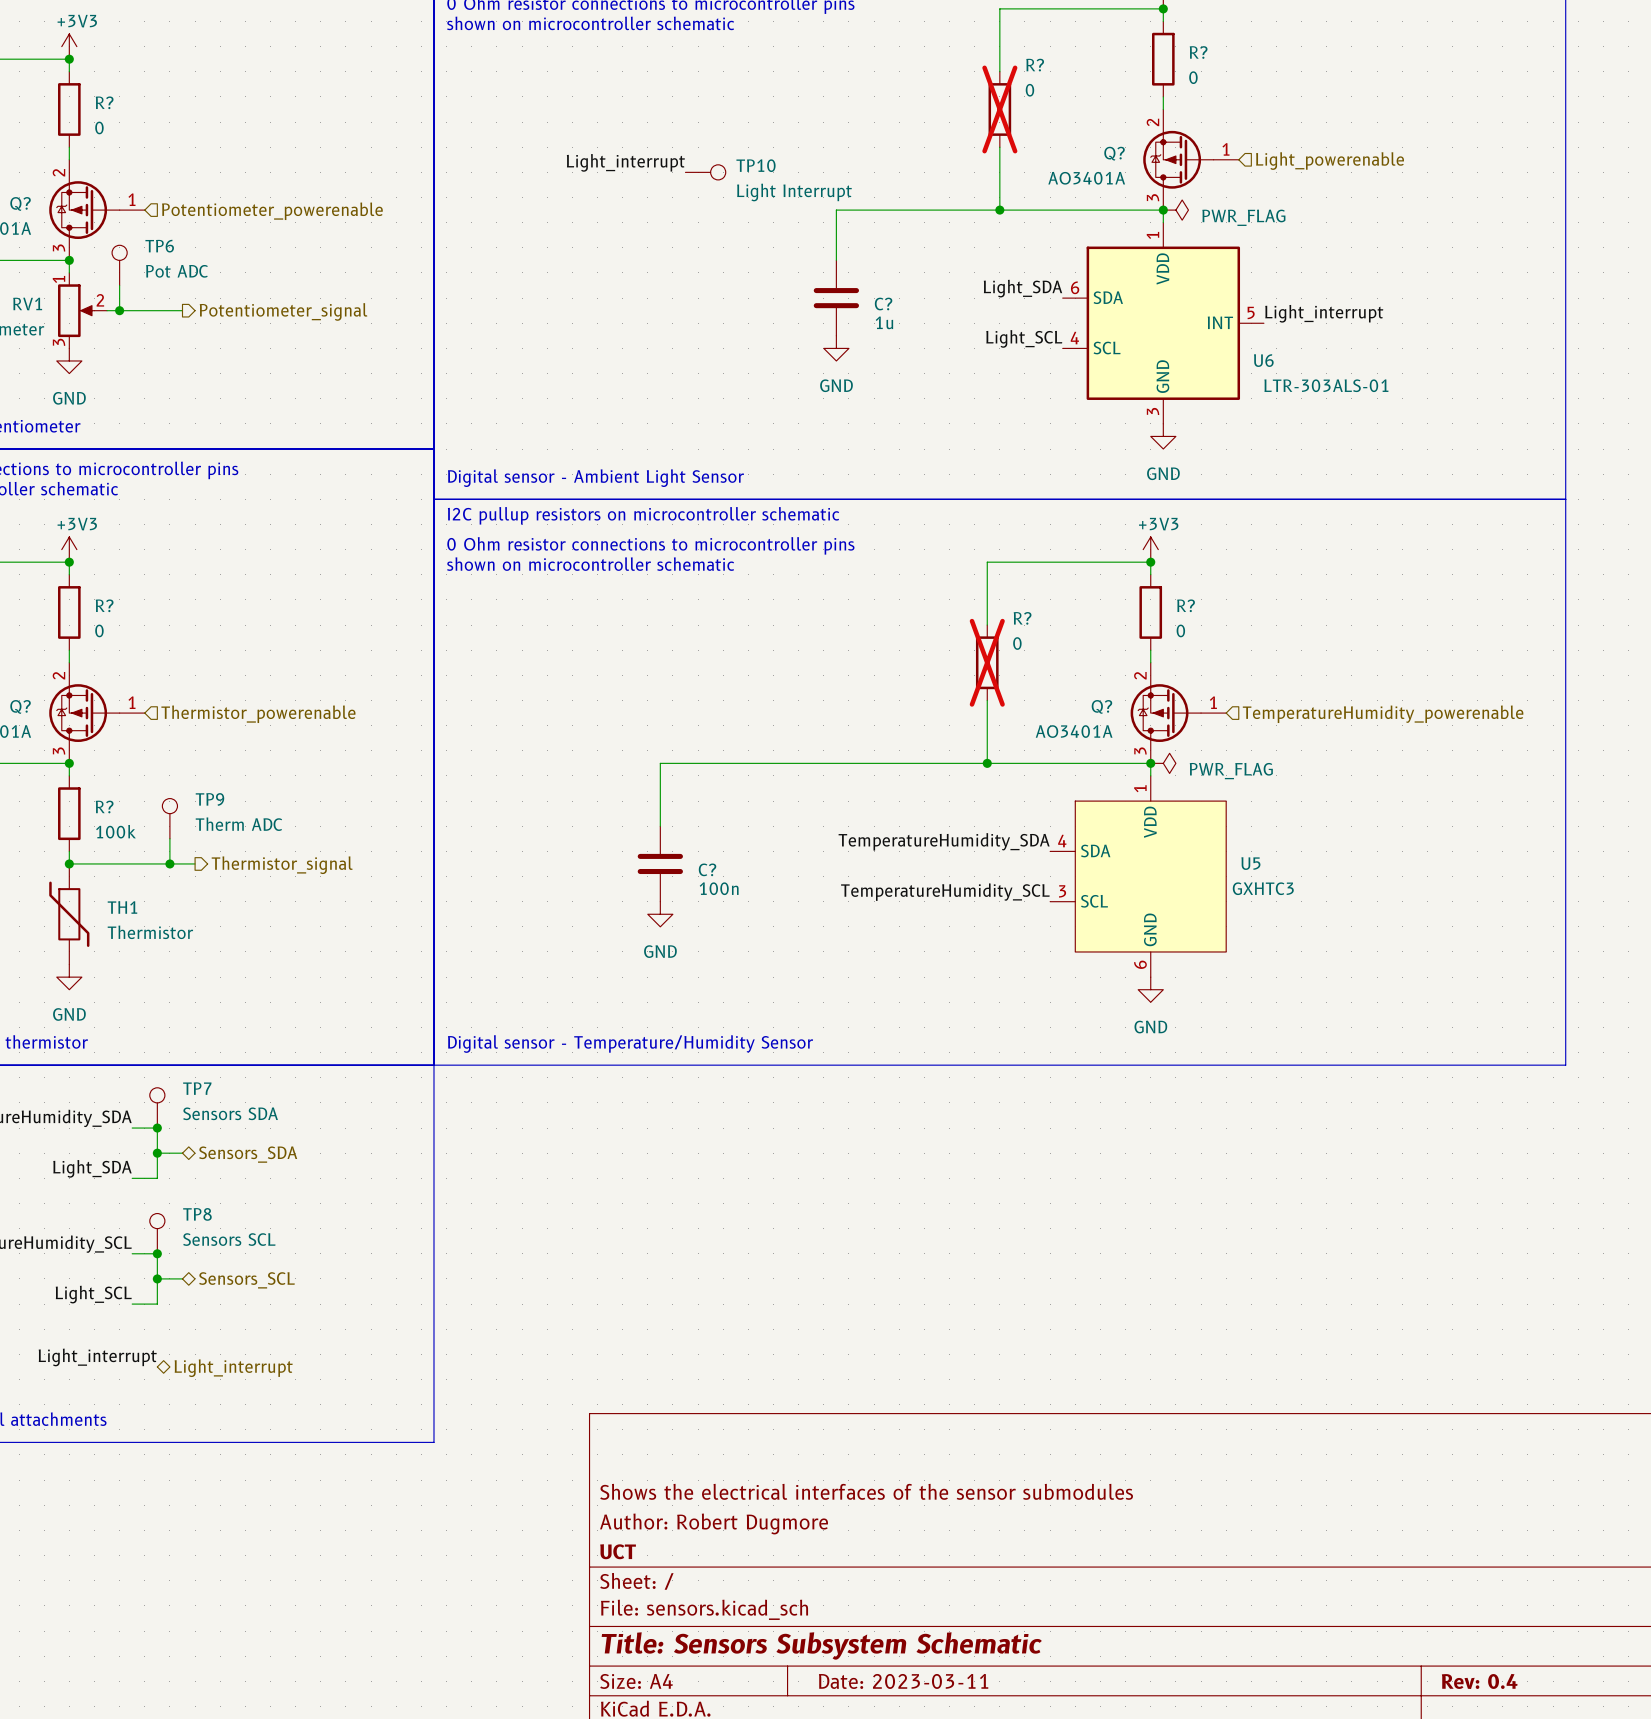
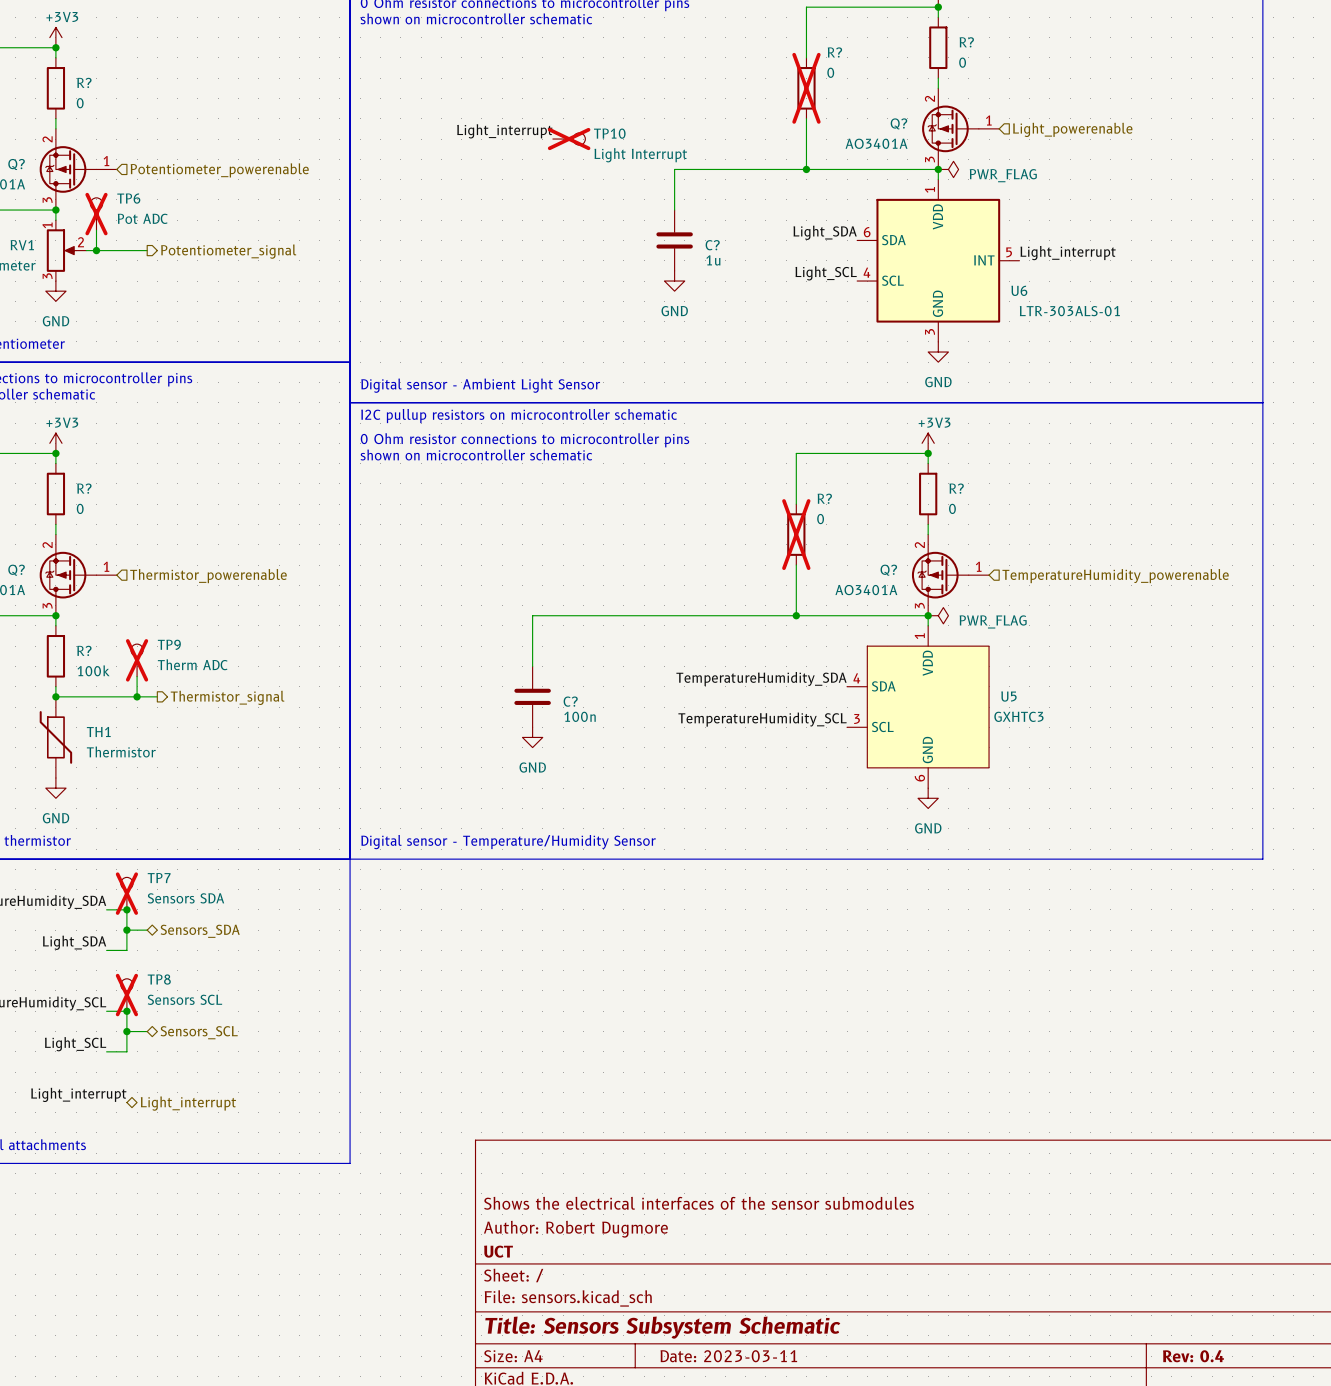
TP10 do-not-place cross: none -> (569, 139)
TP6 do-not-place cross: none -> (96, 214)
TP9 do-not-place cross: none -> (137, 660)
TP7 do-not-place cross: none -> (126, 893)
TP8 do-not-place cross: none -> (126, 995)

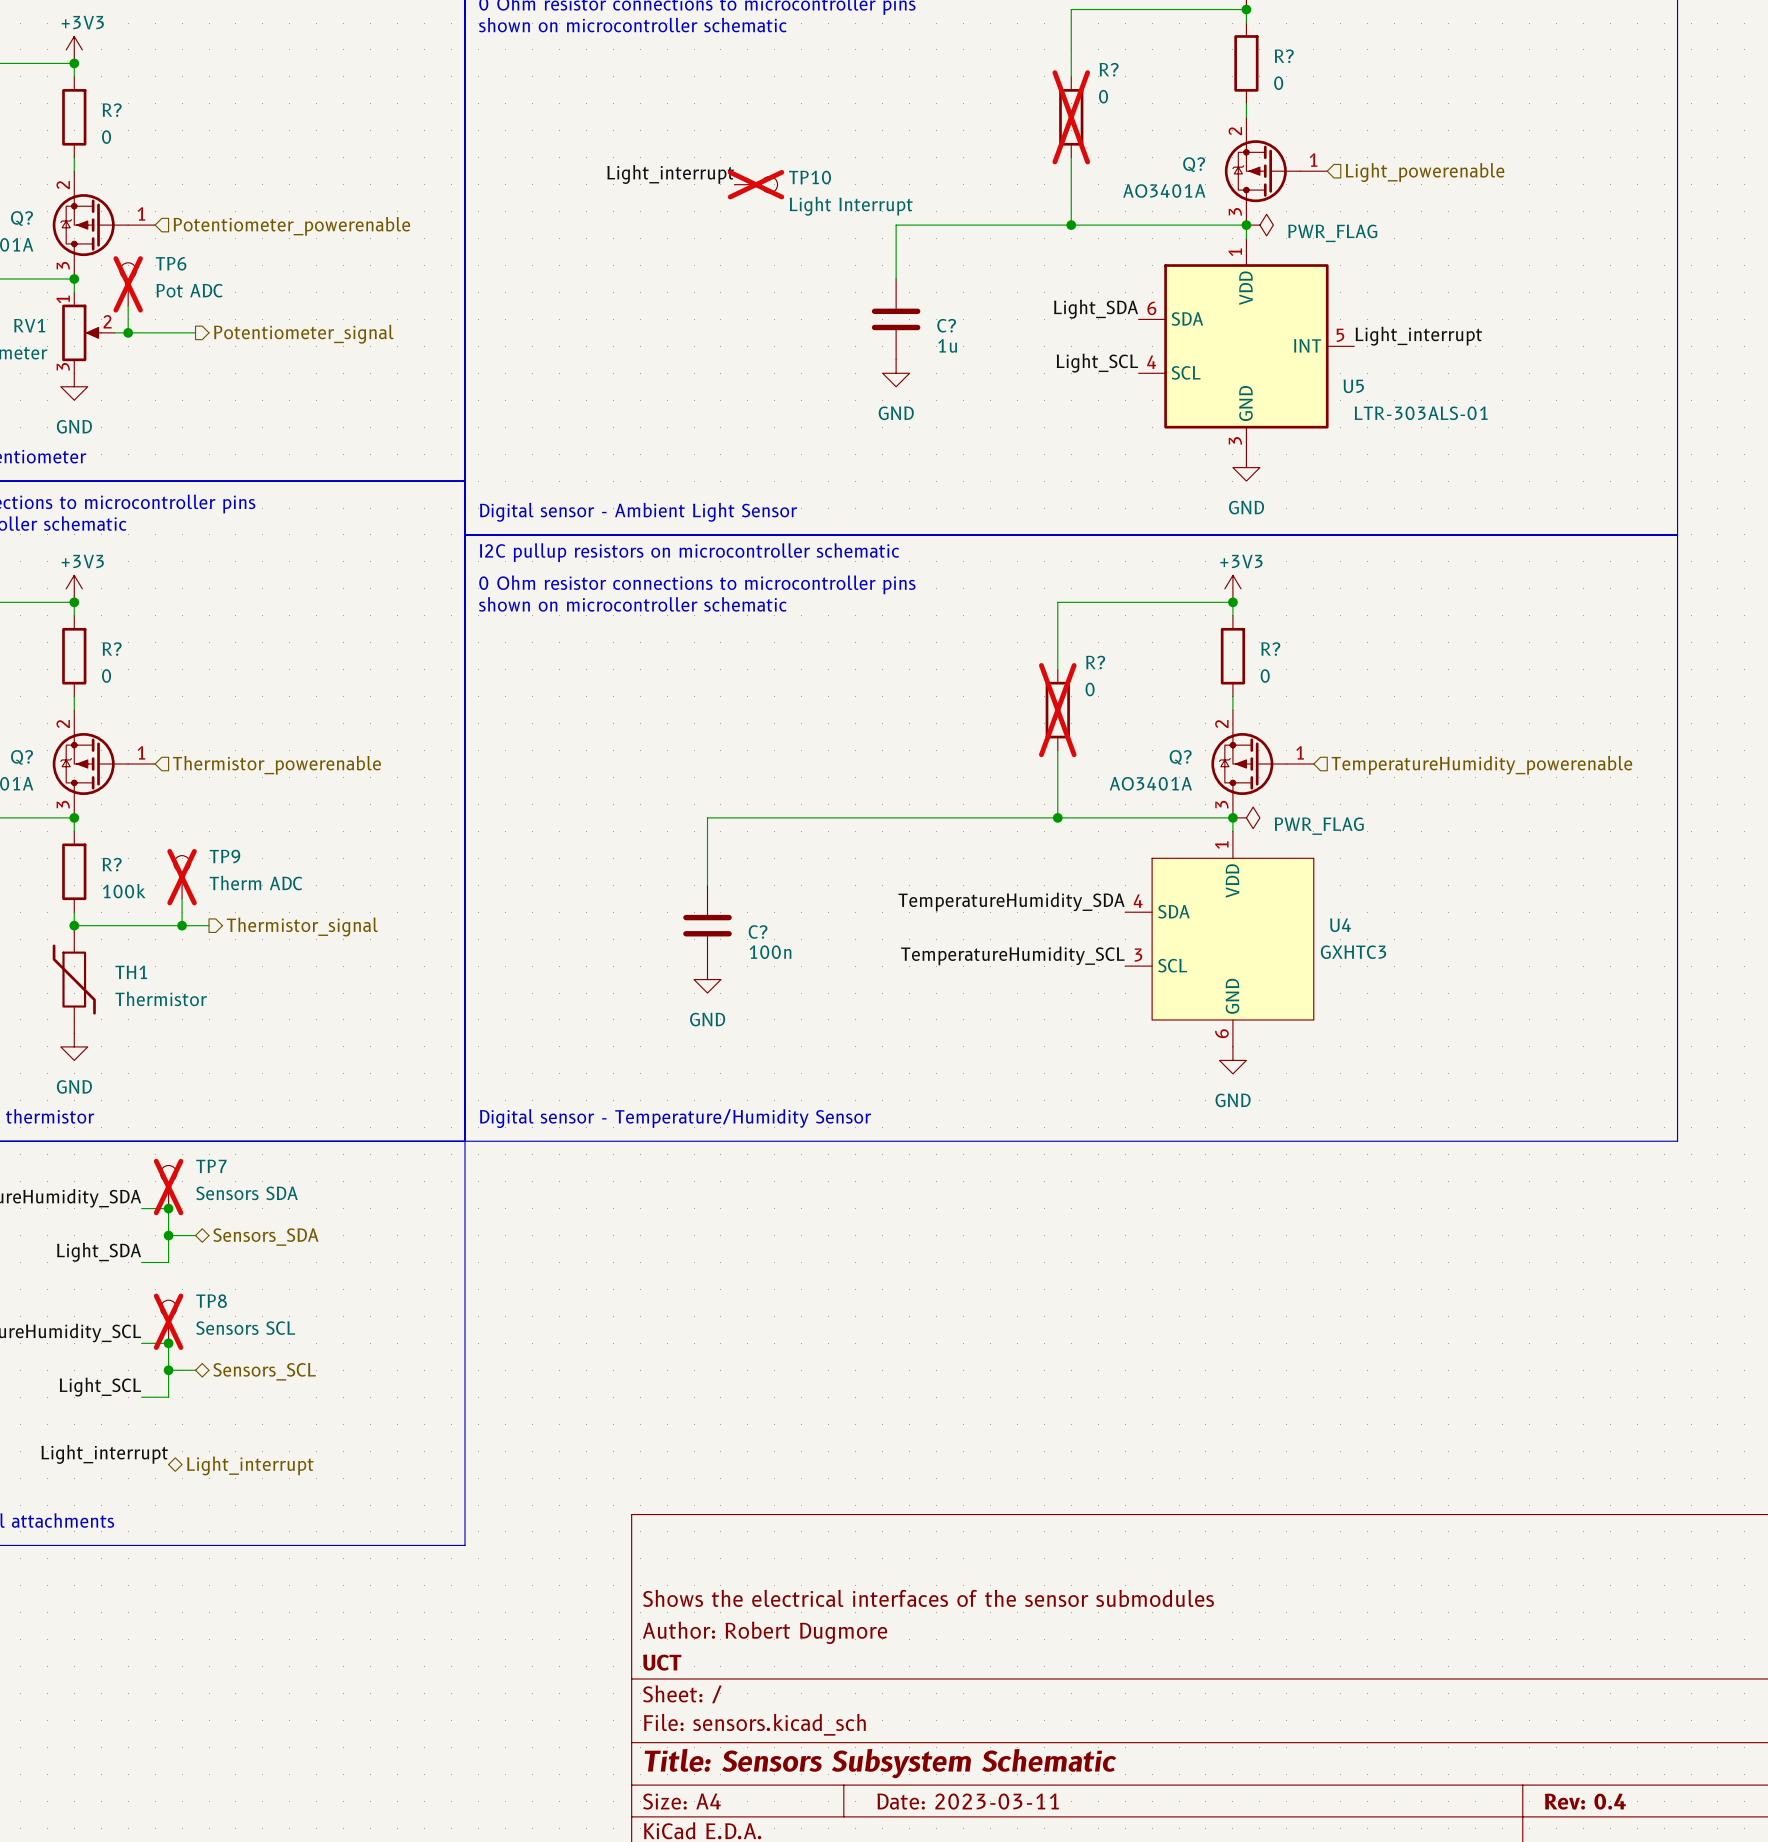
U6 name: U6 (1019, 290) -> U5 (1353, 386)
U5 name: U5 (1008, 696) -> U4 (1340, 925)

